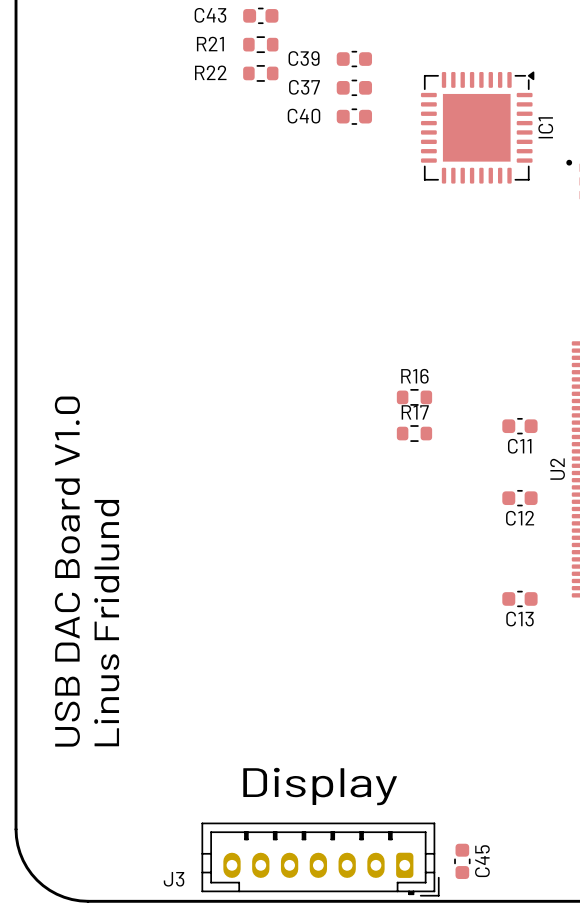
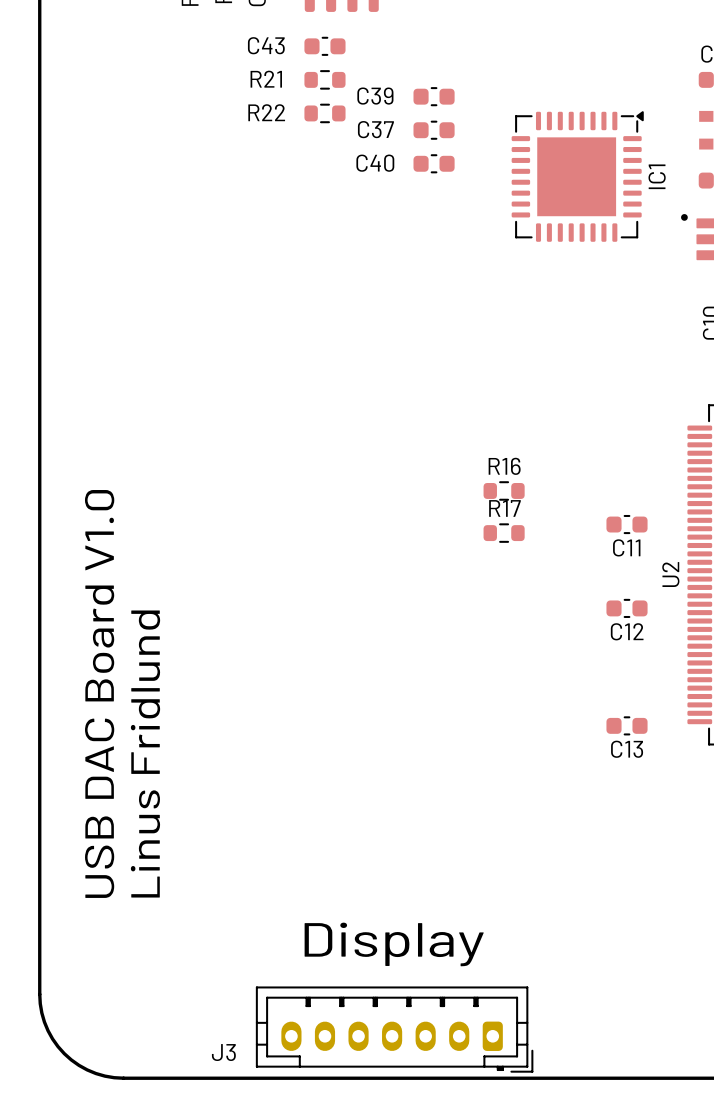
C45: (462, 861) -> none

